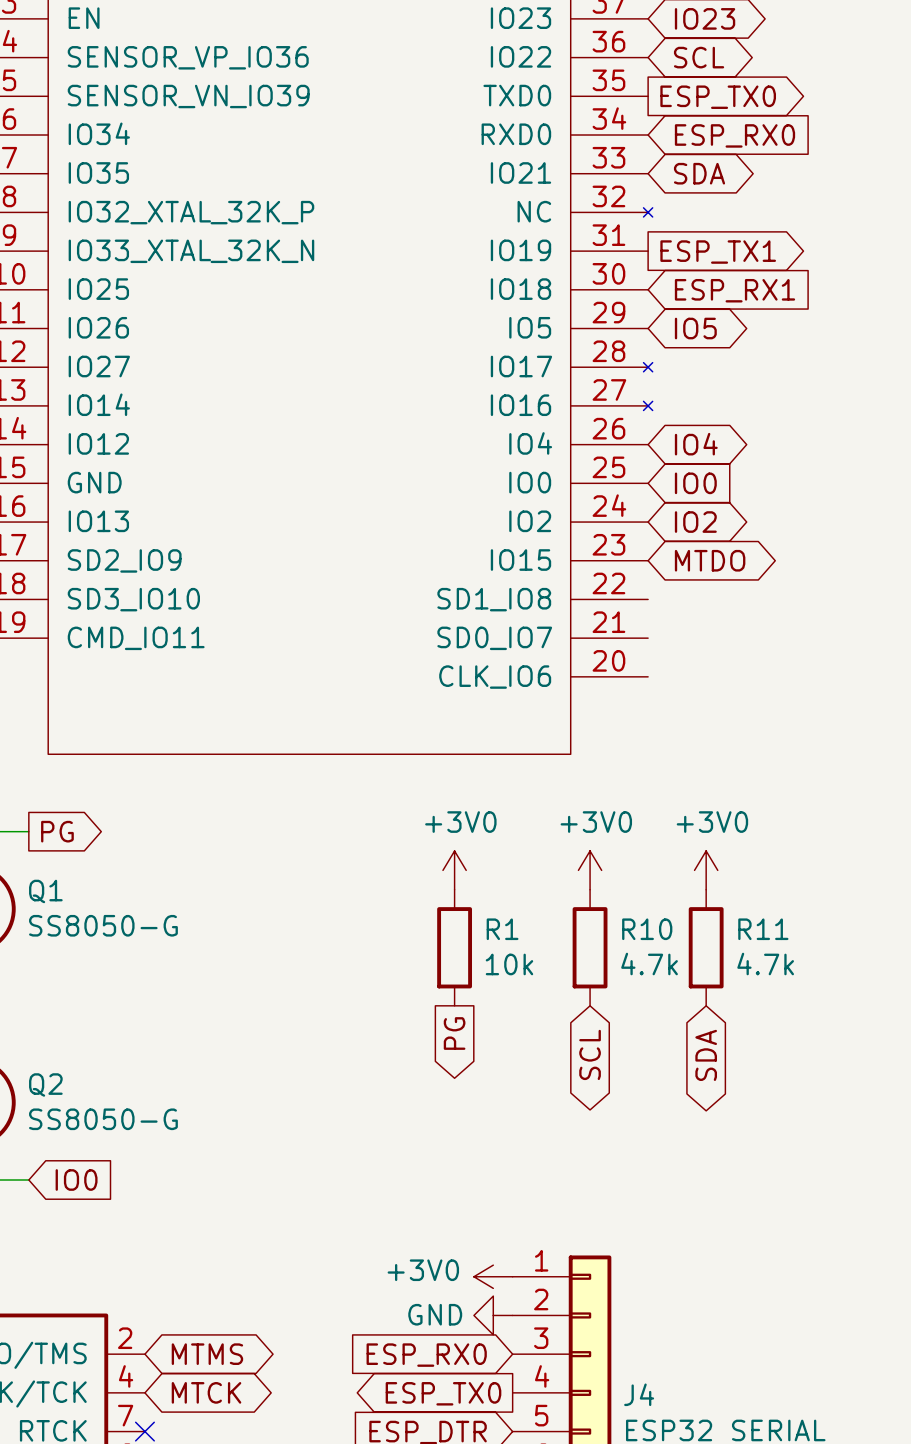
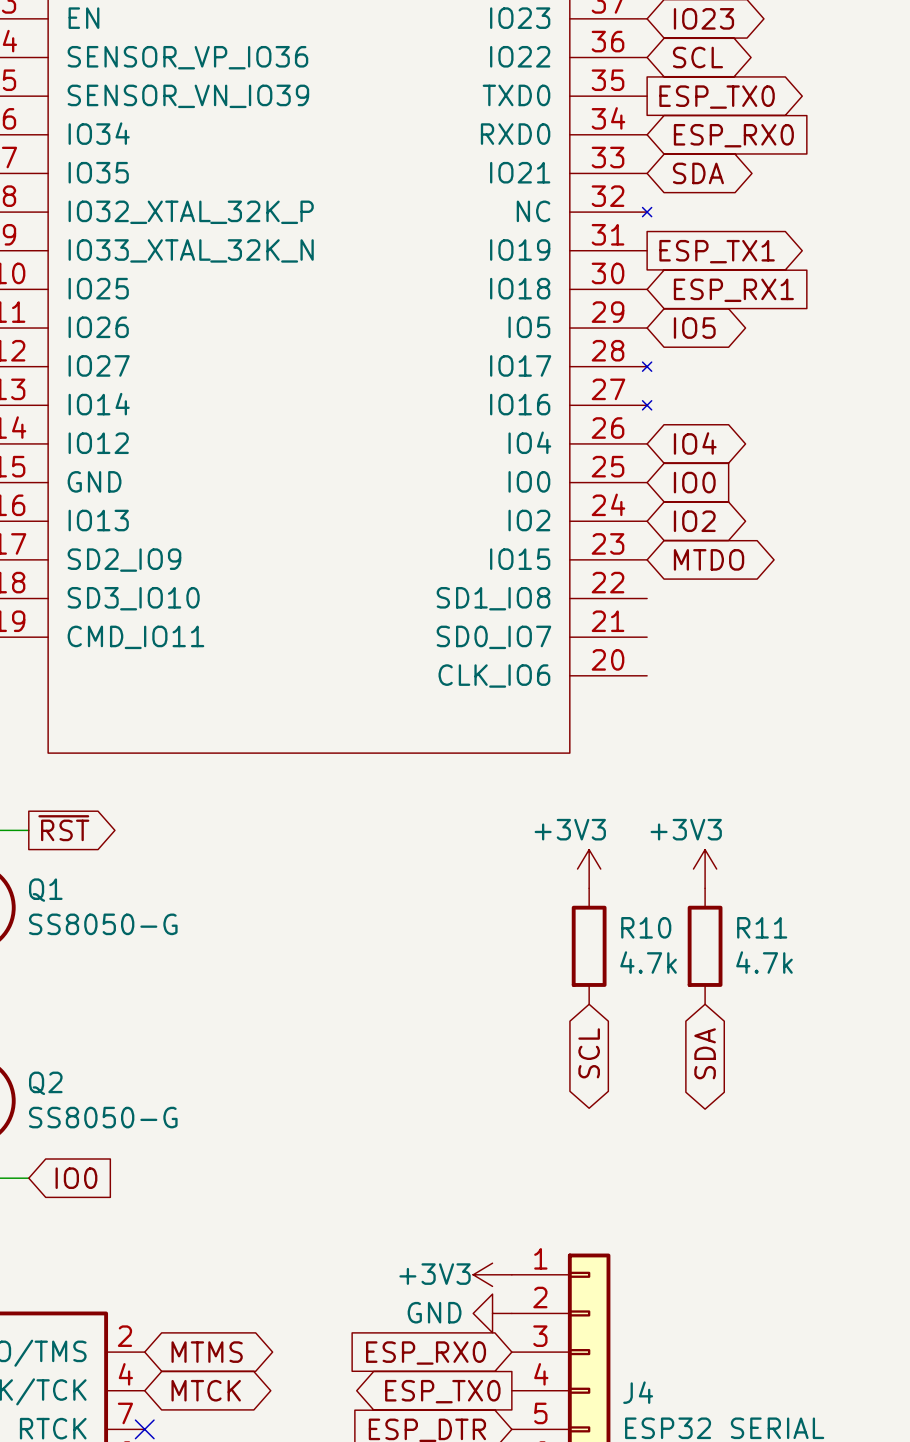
global label: PG (57, 831) -> ~{RST} (63, 828)
power symbol: +3V0 (454, 870) -> none
power symbol: +3V0 (590, 870) -> +3V3 (589, 869)
power symbol: +3V0 (706, 870) -> +3V3 (705, 869)
R1: 10k (454, 947) -> none
global label: PG (454, 1033) -> none
power symbol: +3V0 (493, 1276) -> +3V3 (492, 1274)

